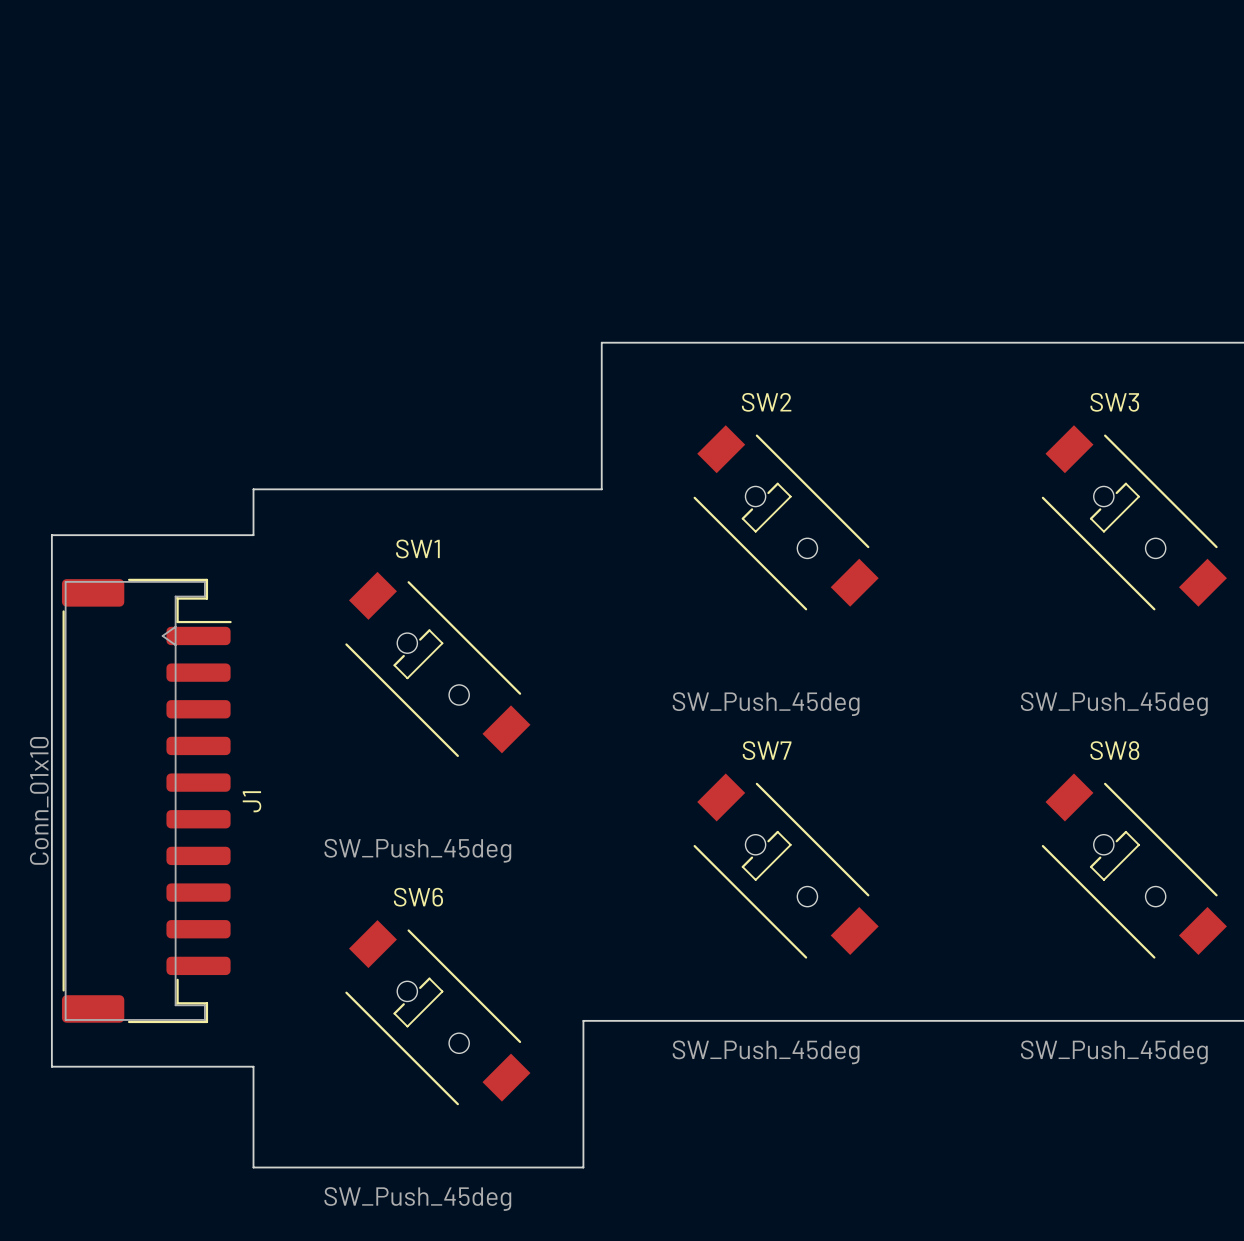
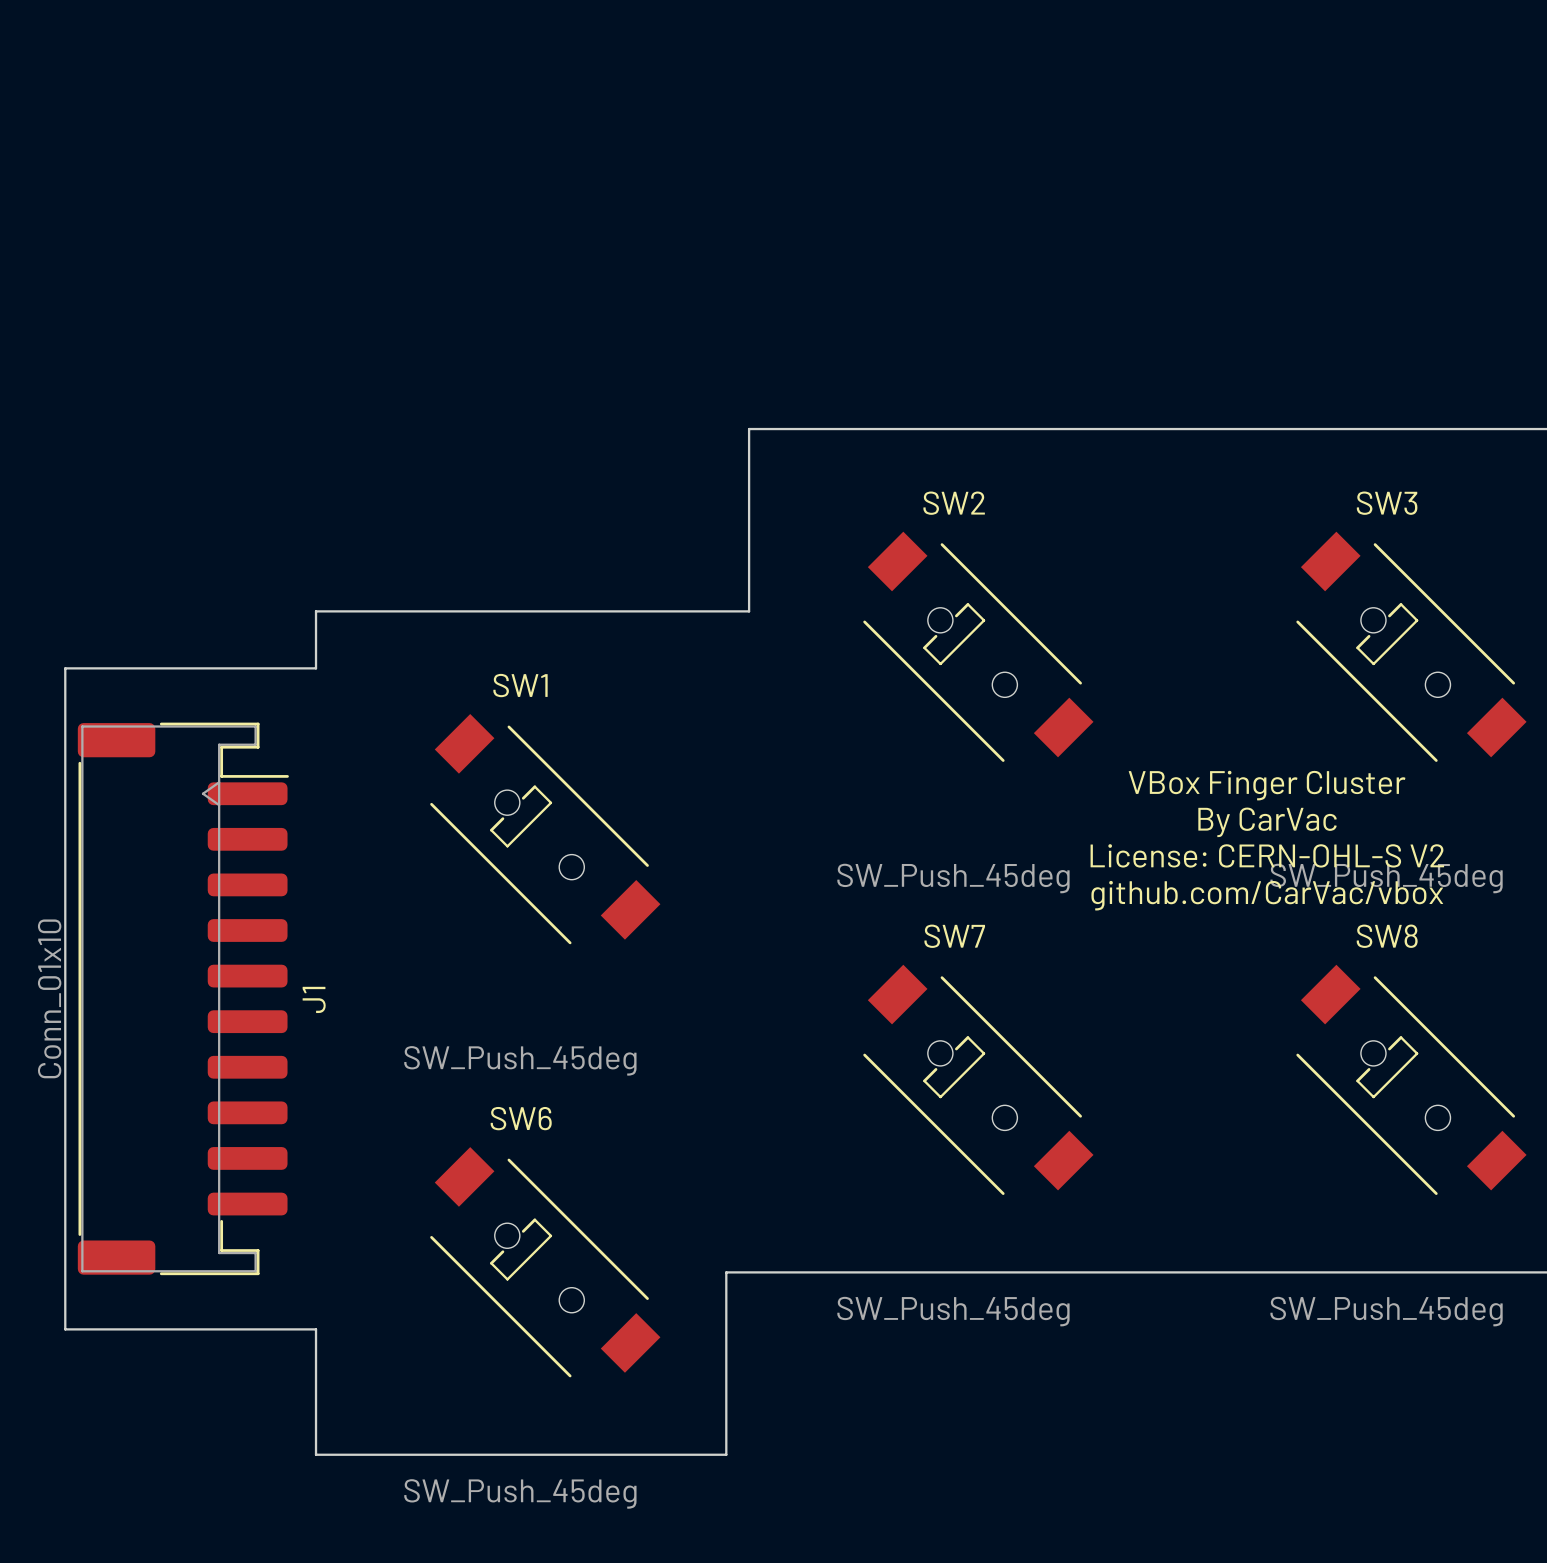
text: none -> VBox Finger Cluster (1267, 785)
text: none -> By CarVac (1267, 822)
text: none -> License: CERN-OHL-S V2 (1267, 855)
text: none -> github.com/CarVac/vbox (1267, 895)

